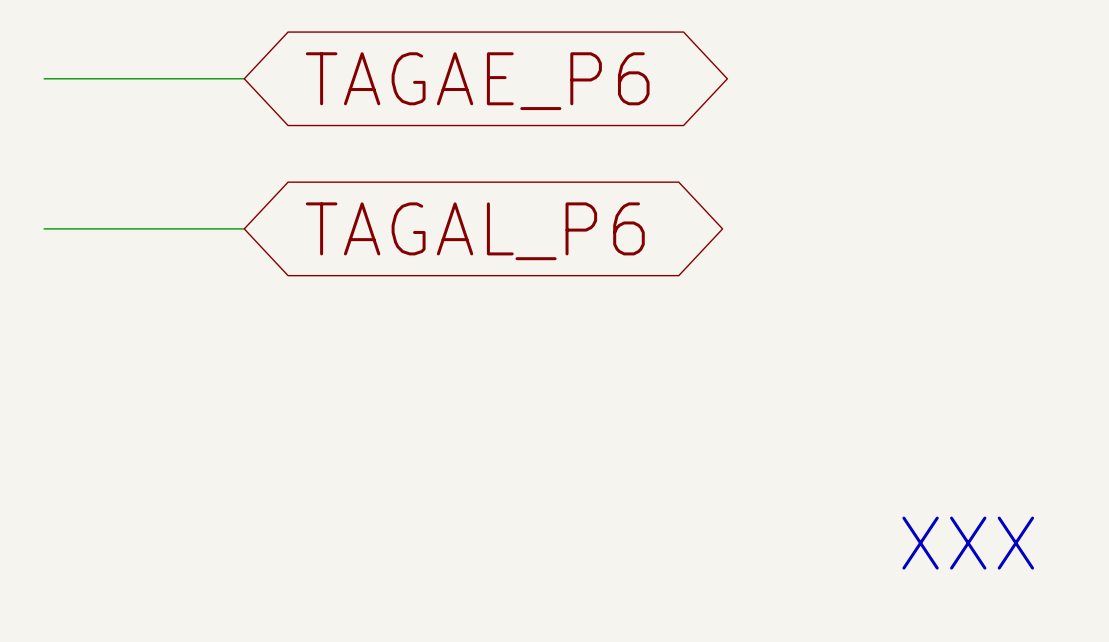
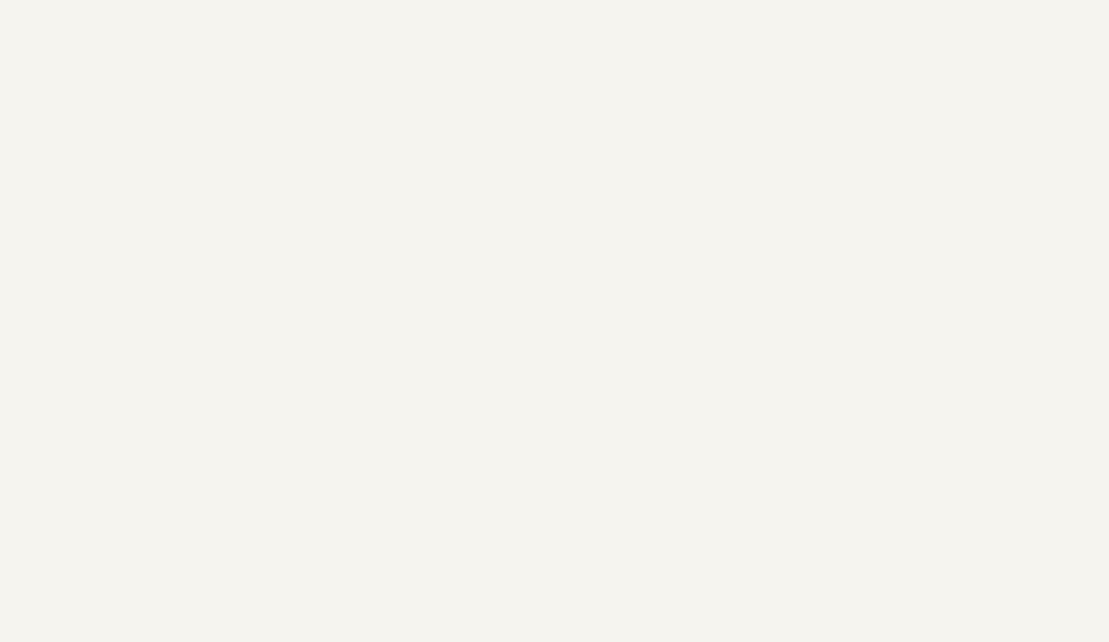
wire: (44, 78) (244, 78) -> none
global label: TAGAE_P6 (477, 81) -> none
wire: (44, 228) (244, 228) -> none
global label: TAGAL_P6 (475, 231) -> none
text: XXX (968, 543) -> none

